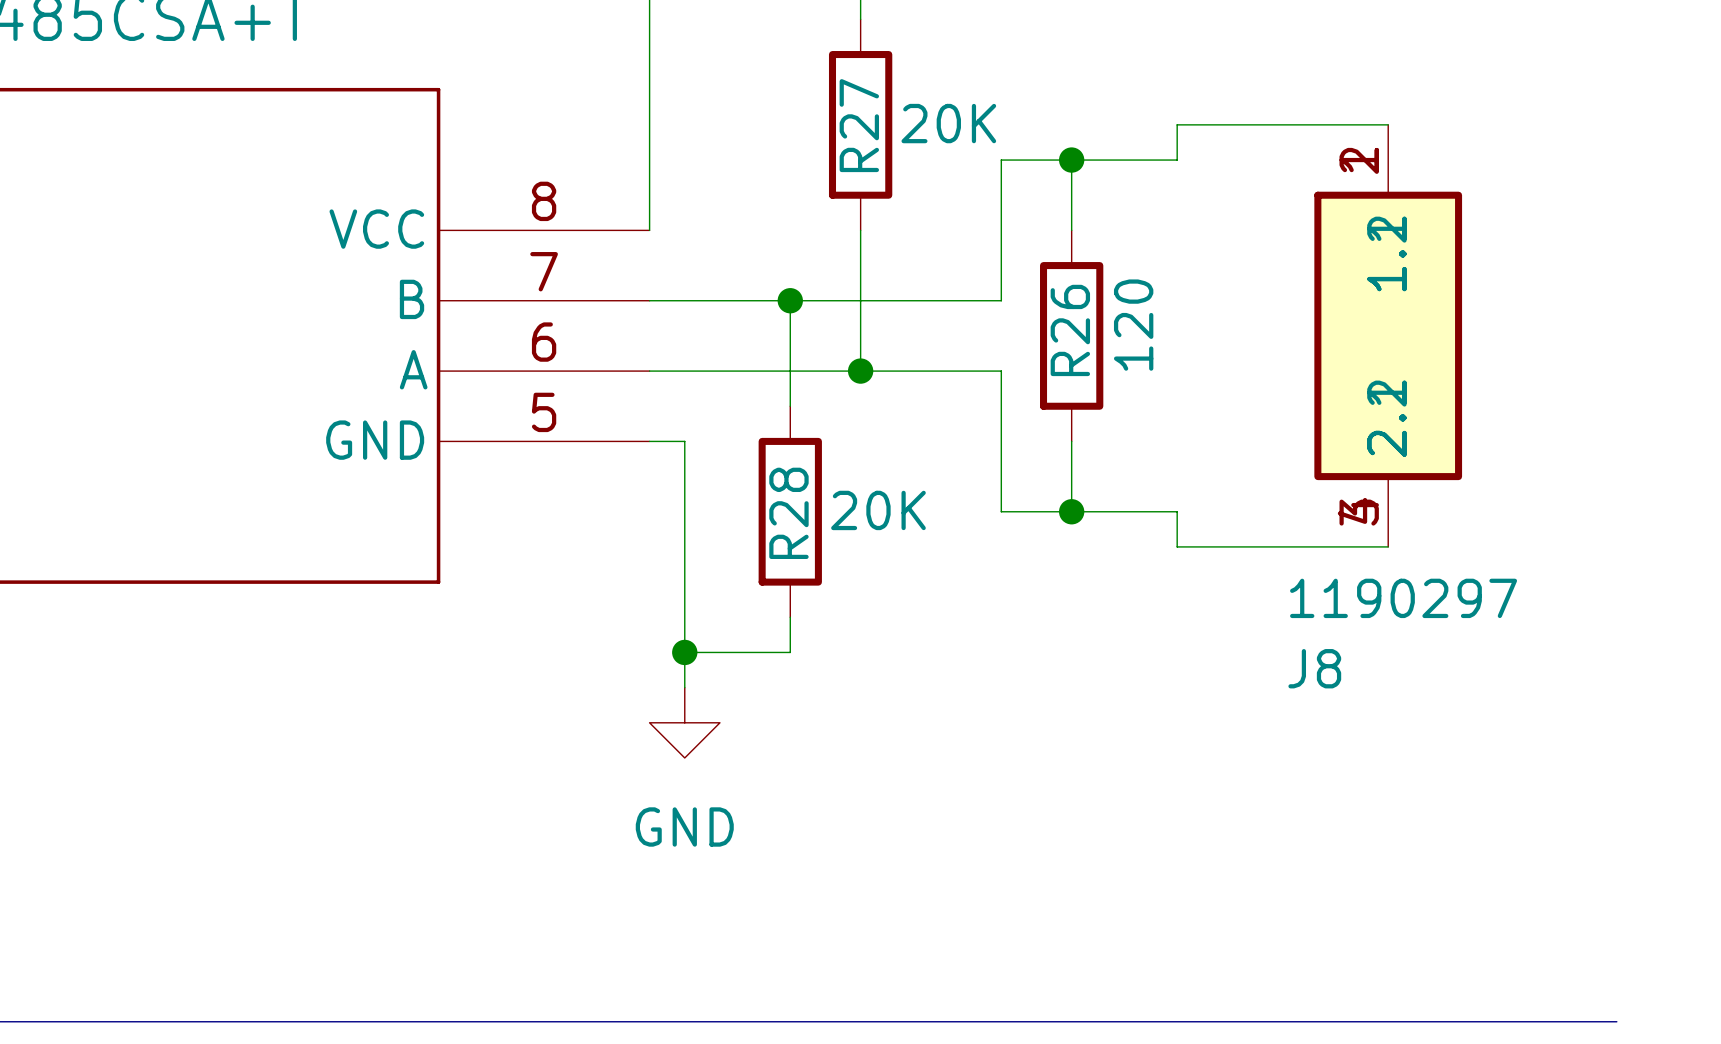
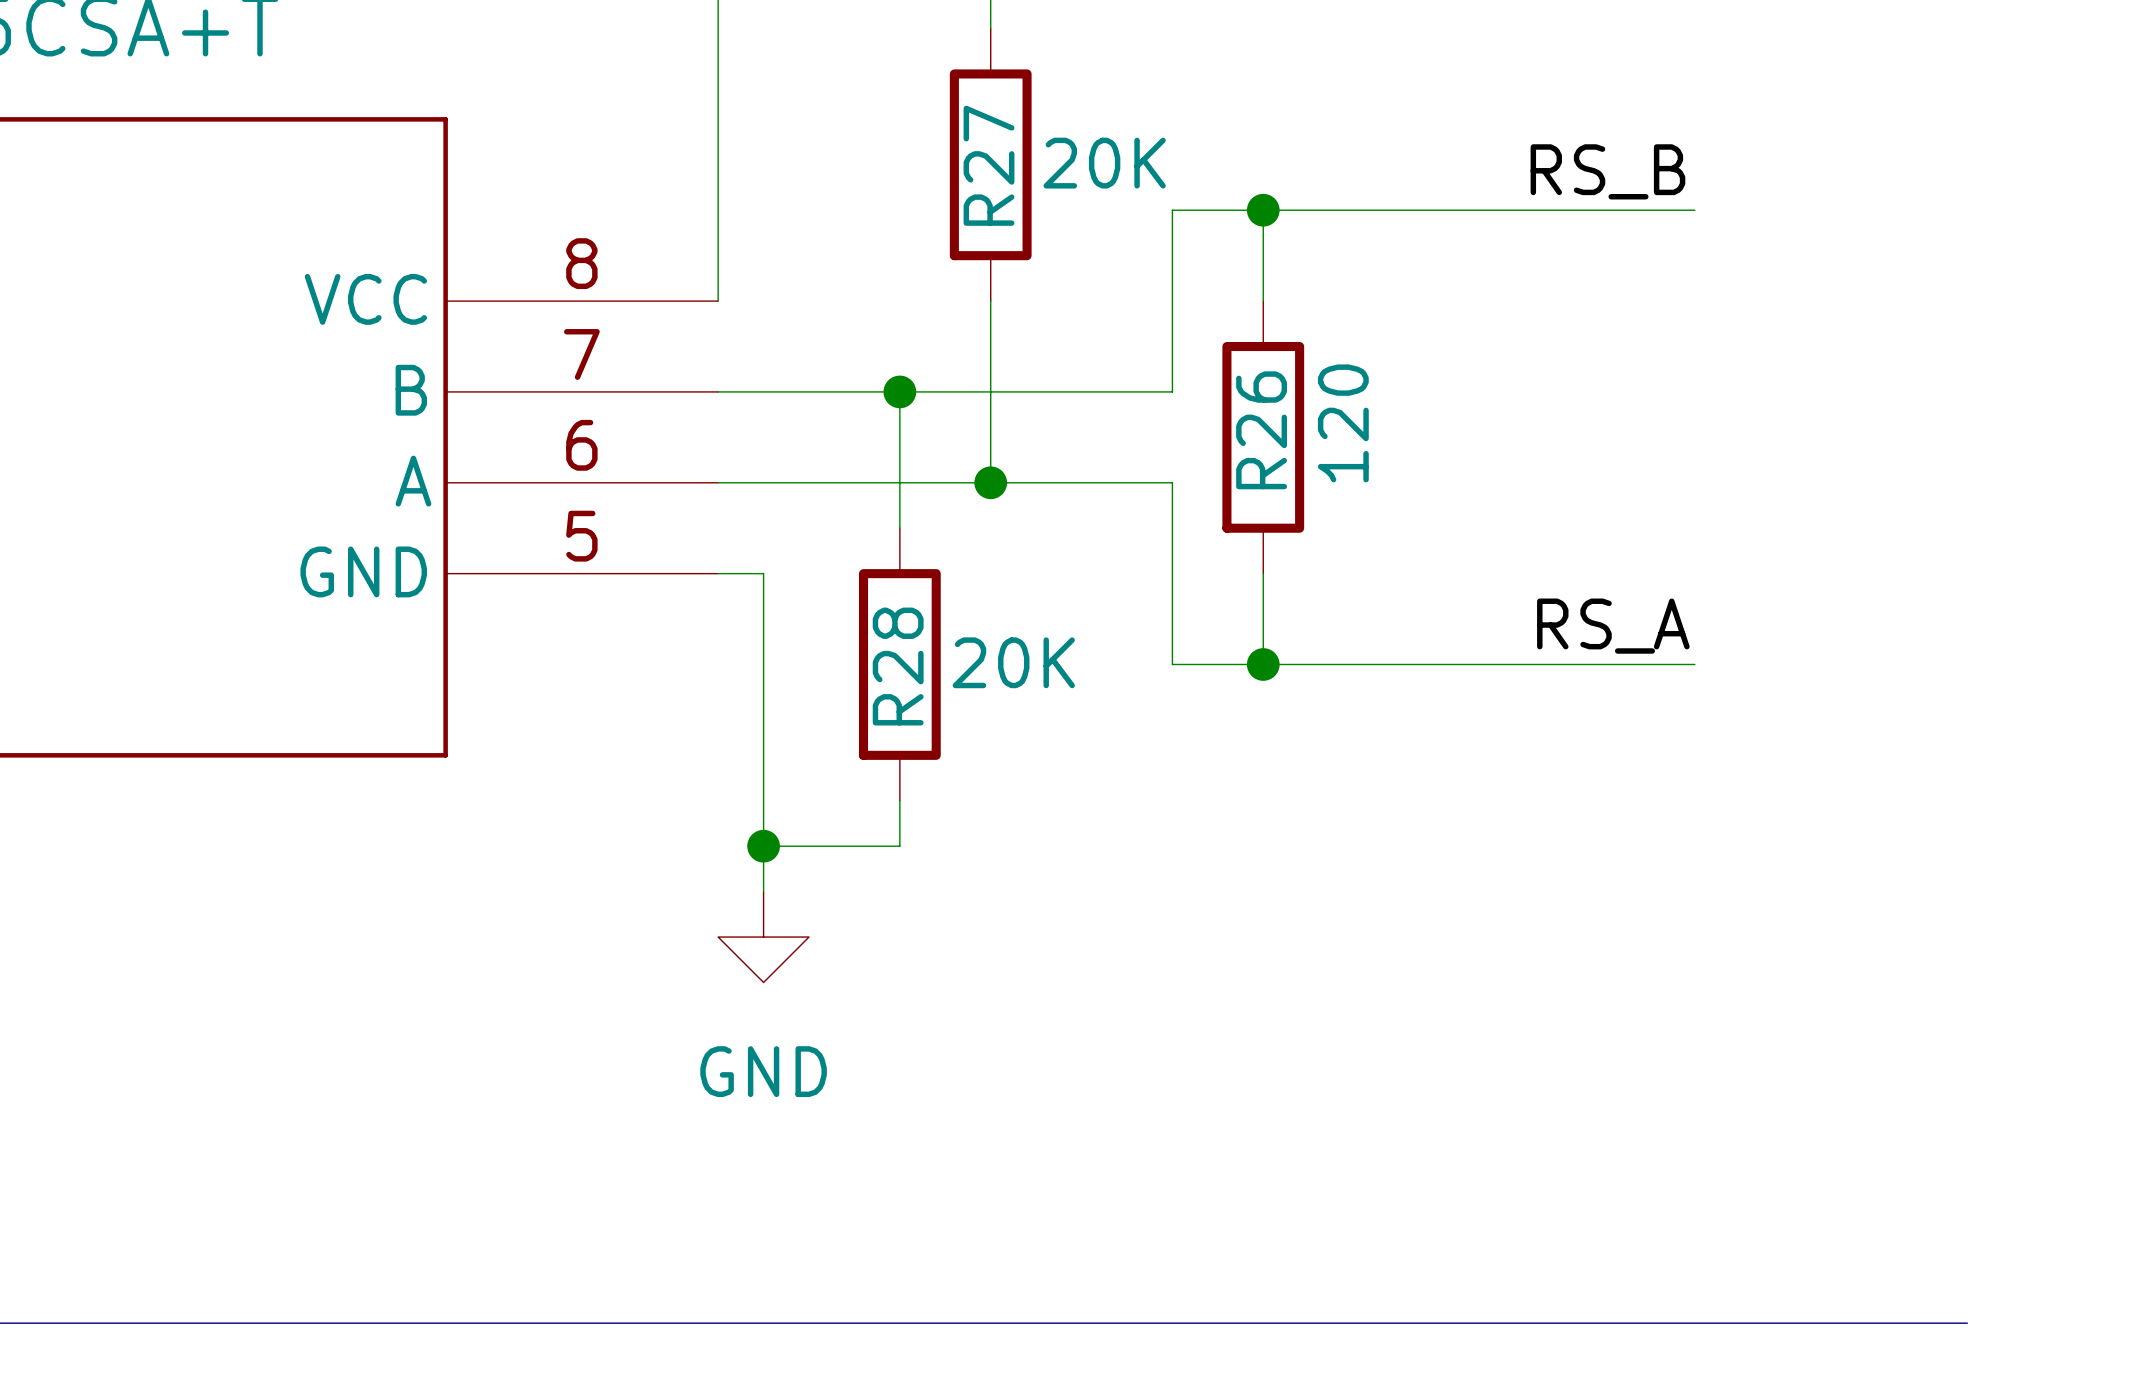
wire: (1388, 124) (1177, 124) (1177, 160) -> (1694, 210) (1399, 210)
label: none -> RS_B (1607, 171)
J8: 1190297 (1388, 335) -> none
label: none -> RS_A (1613, 626)
wire: (1177, 511) (1177, 546) (1388, 546) -> (1399, 664) (1694, 664)

